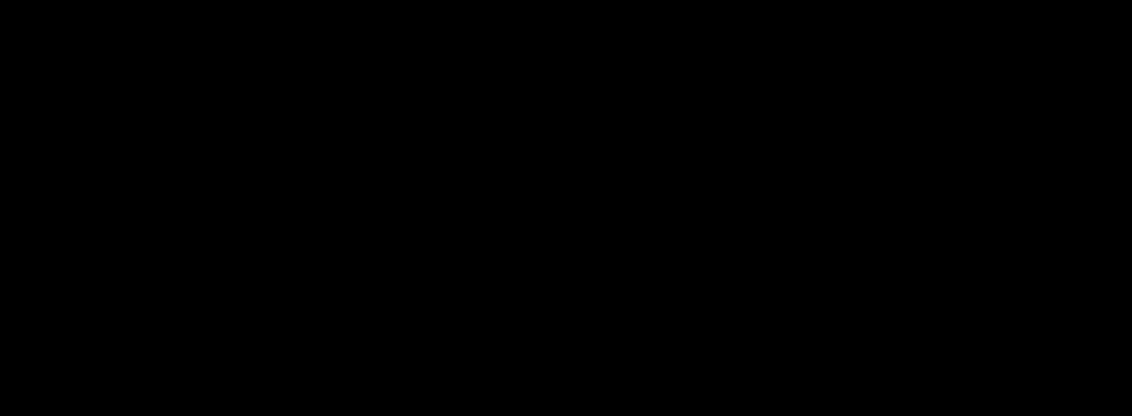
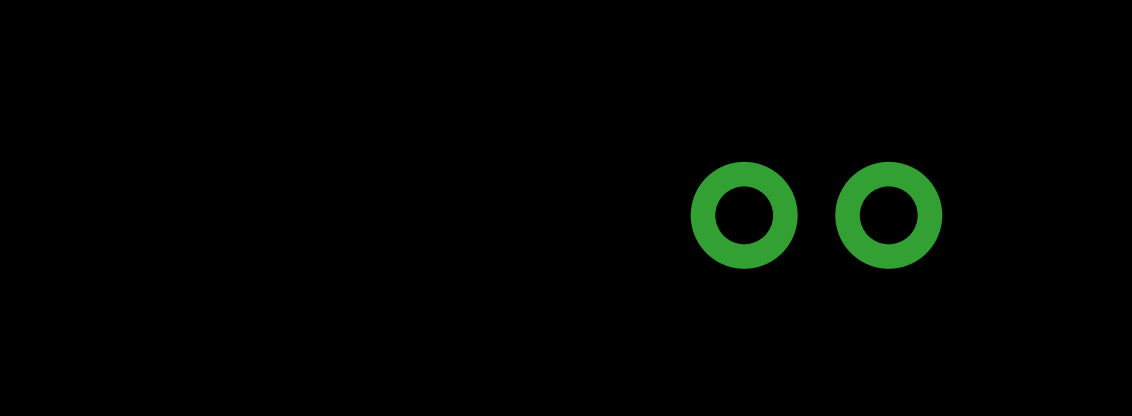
part: none -> (816, 215)

